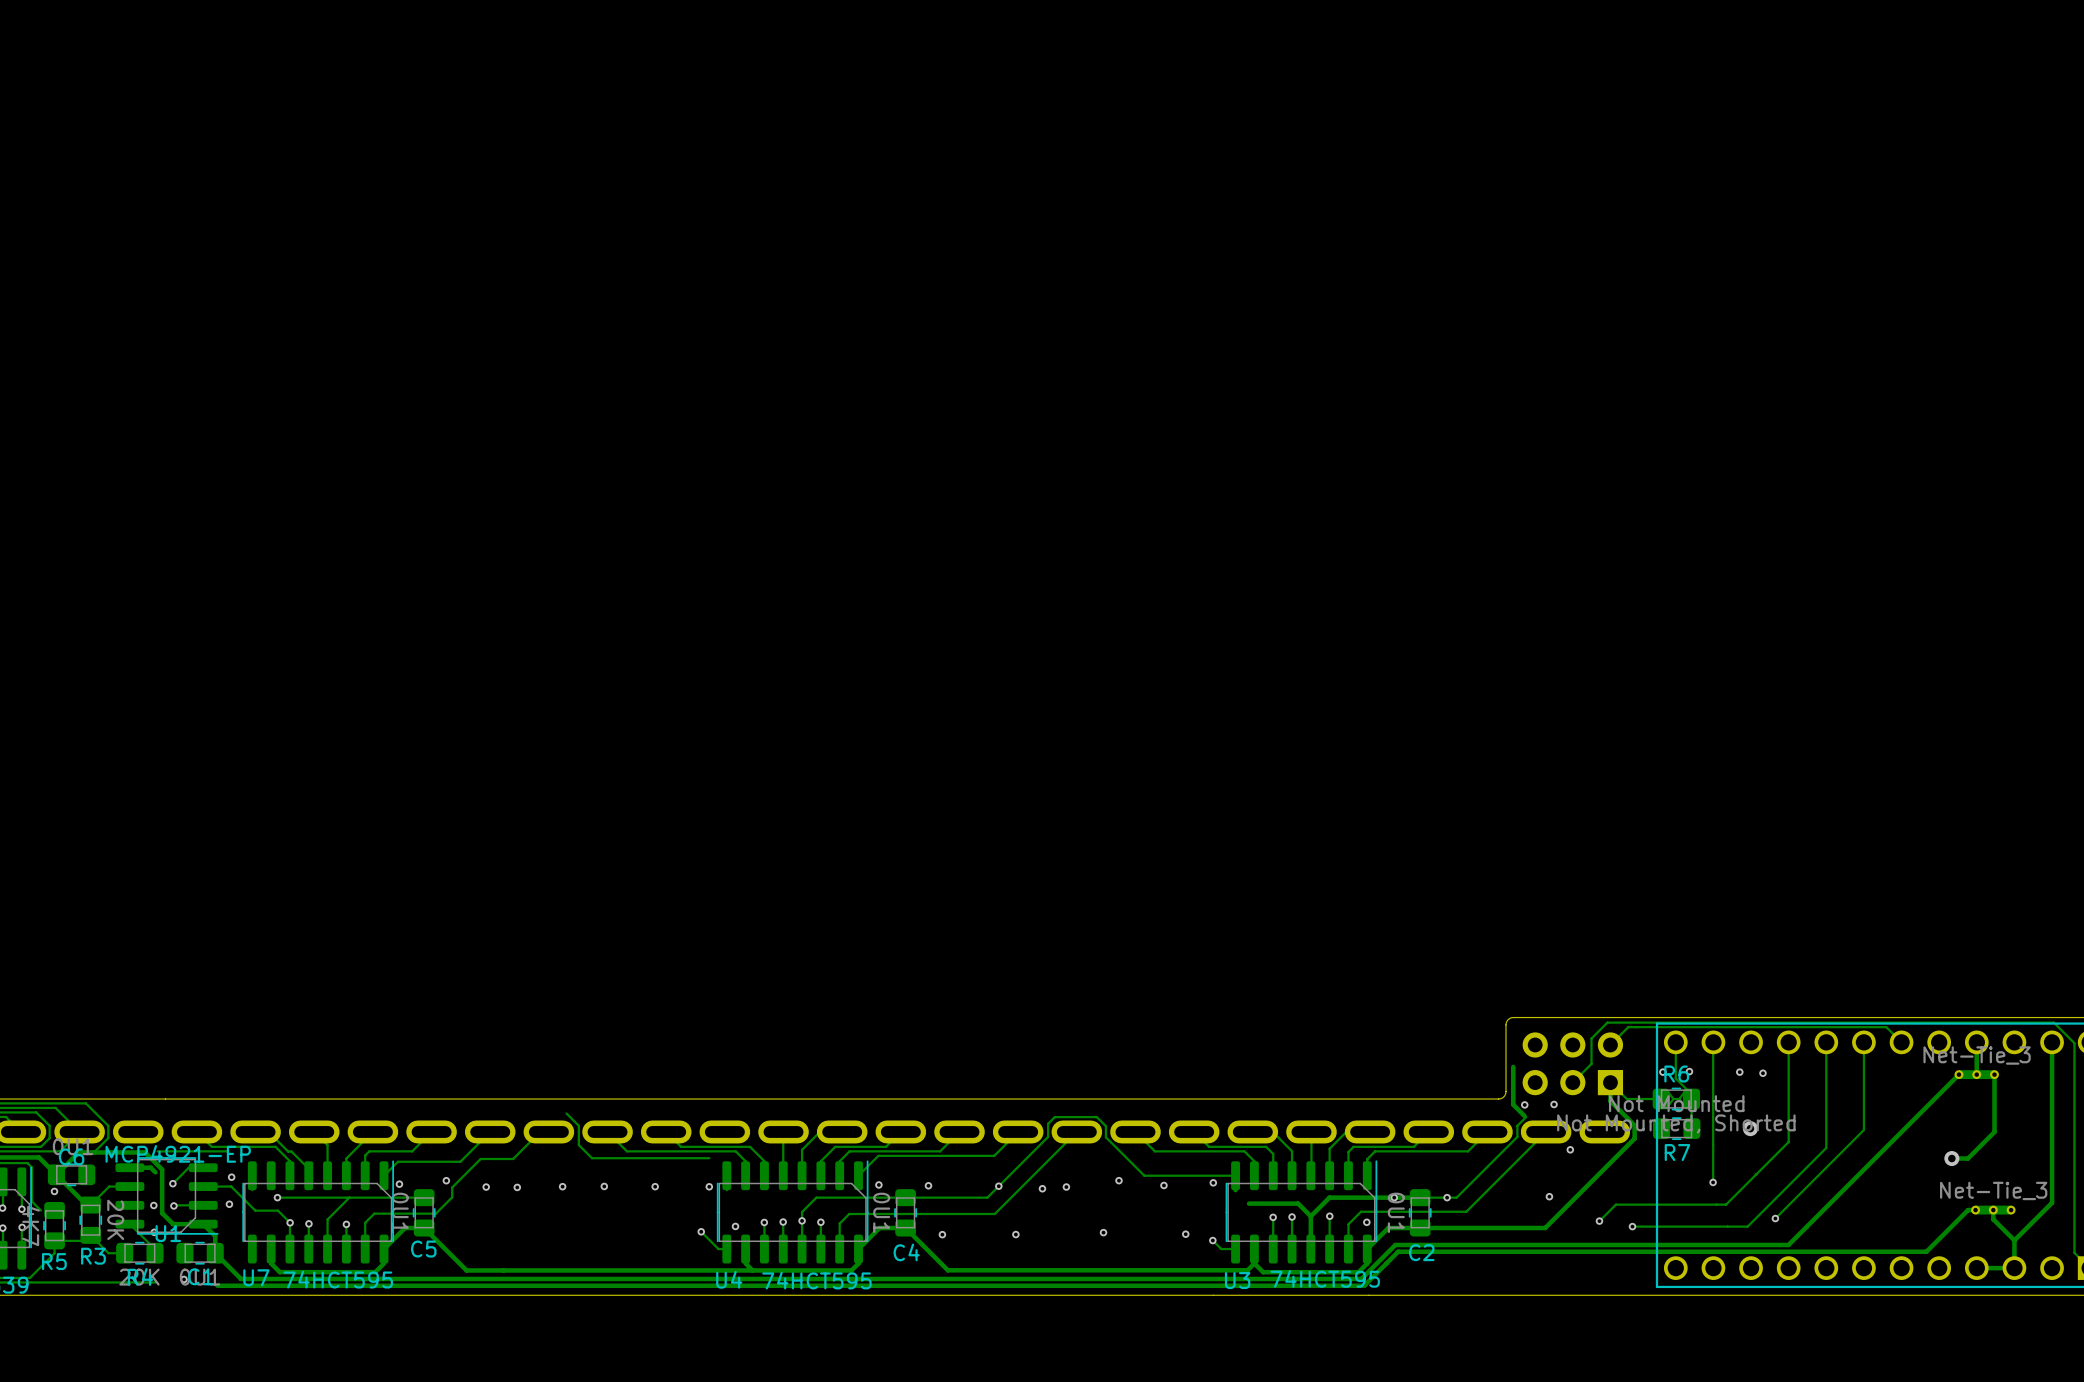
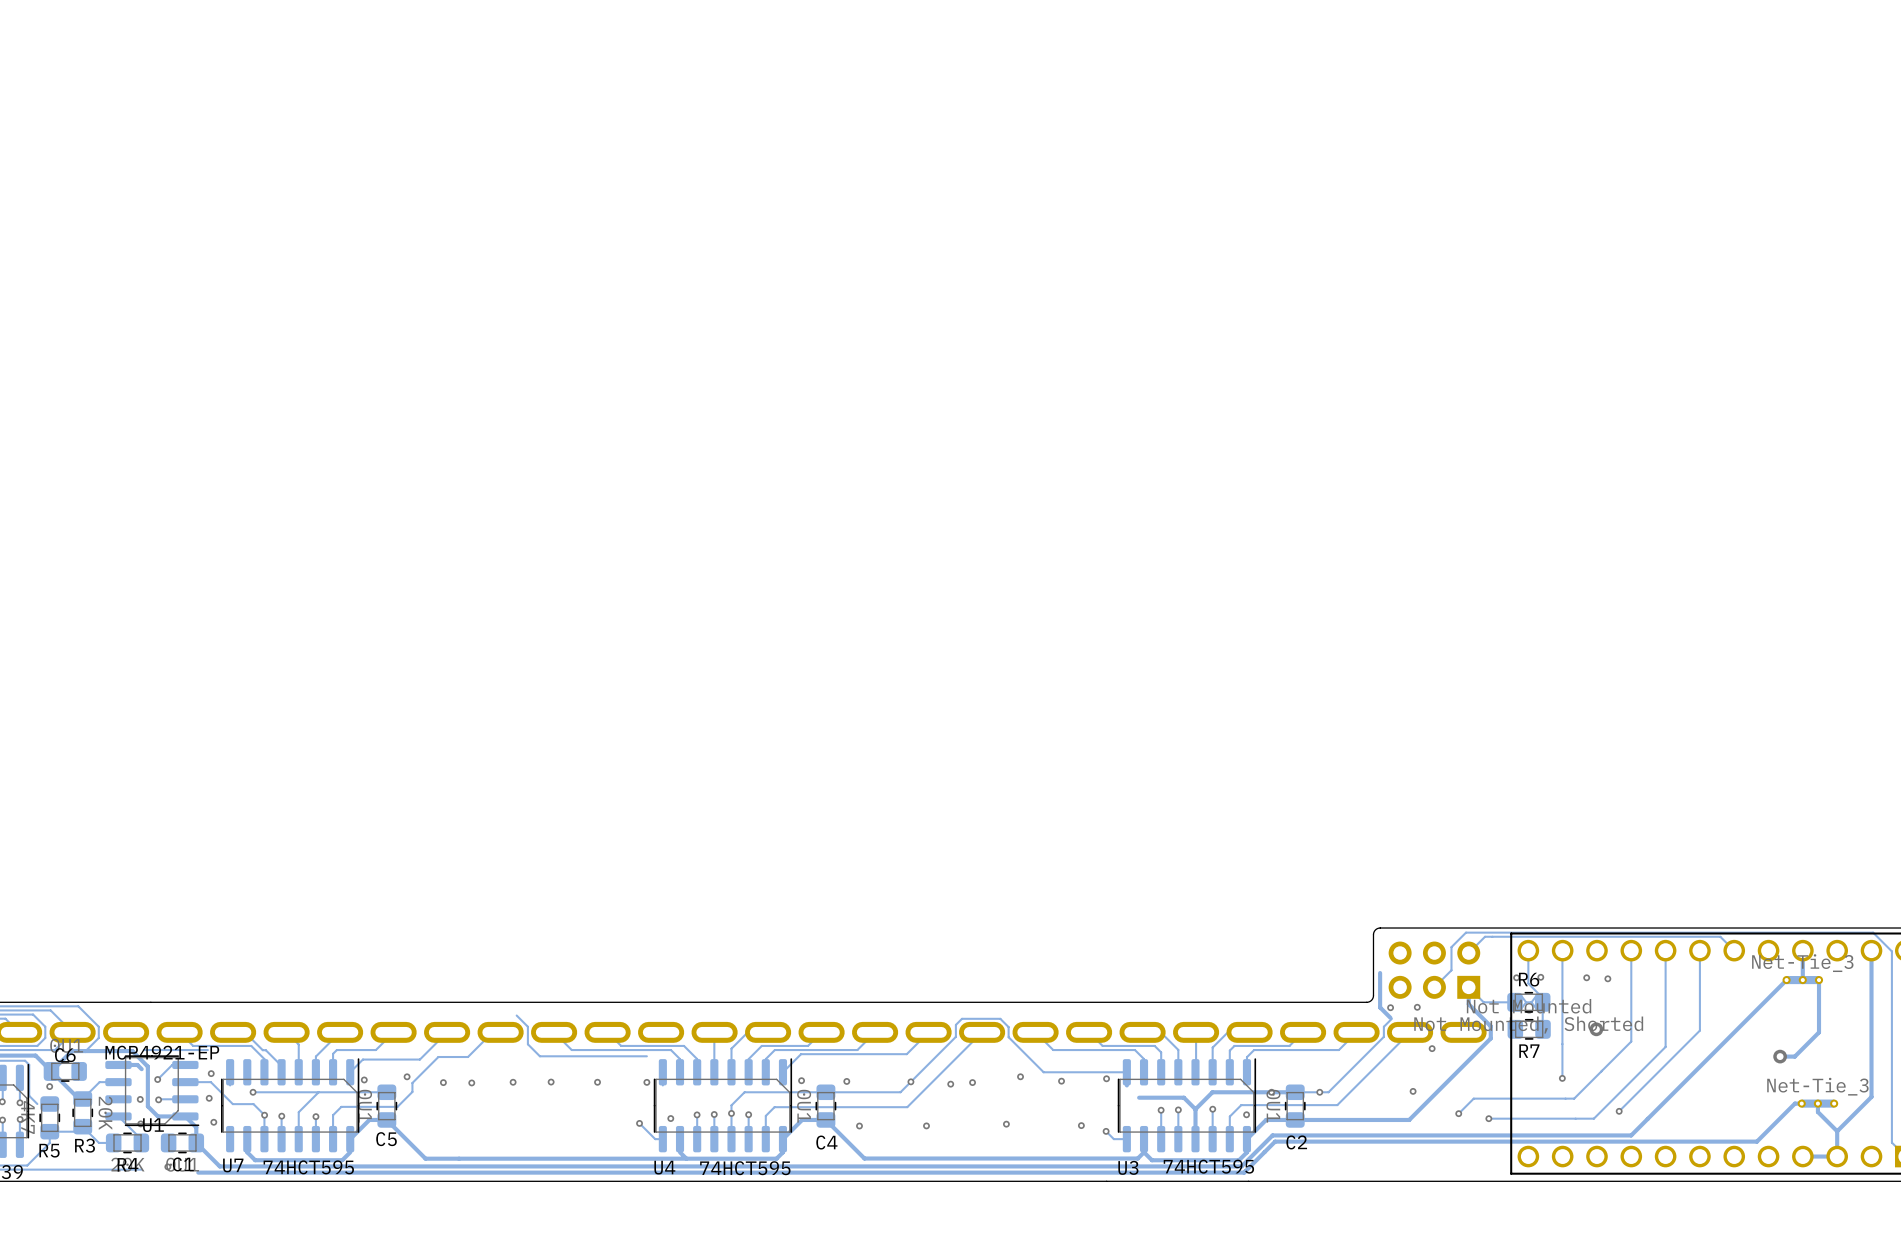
via: none -> (213, 1122)

